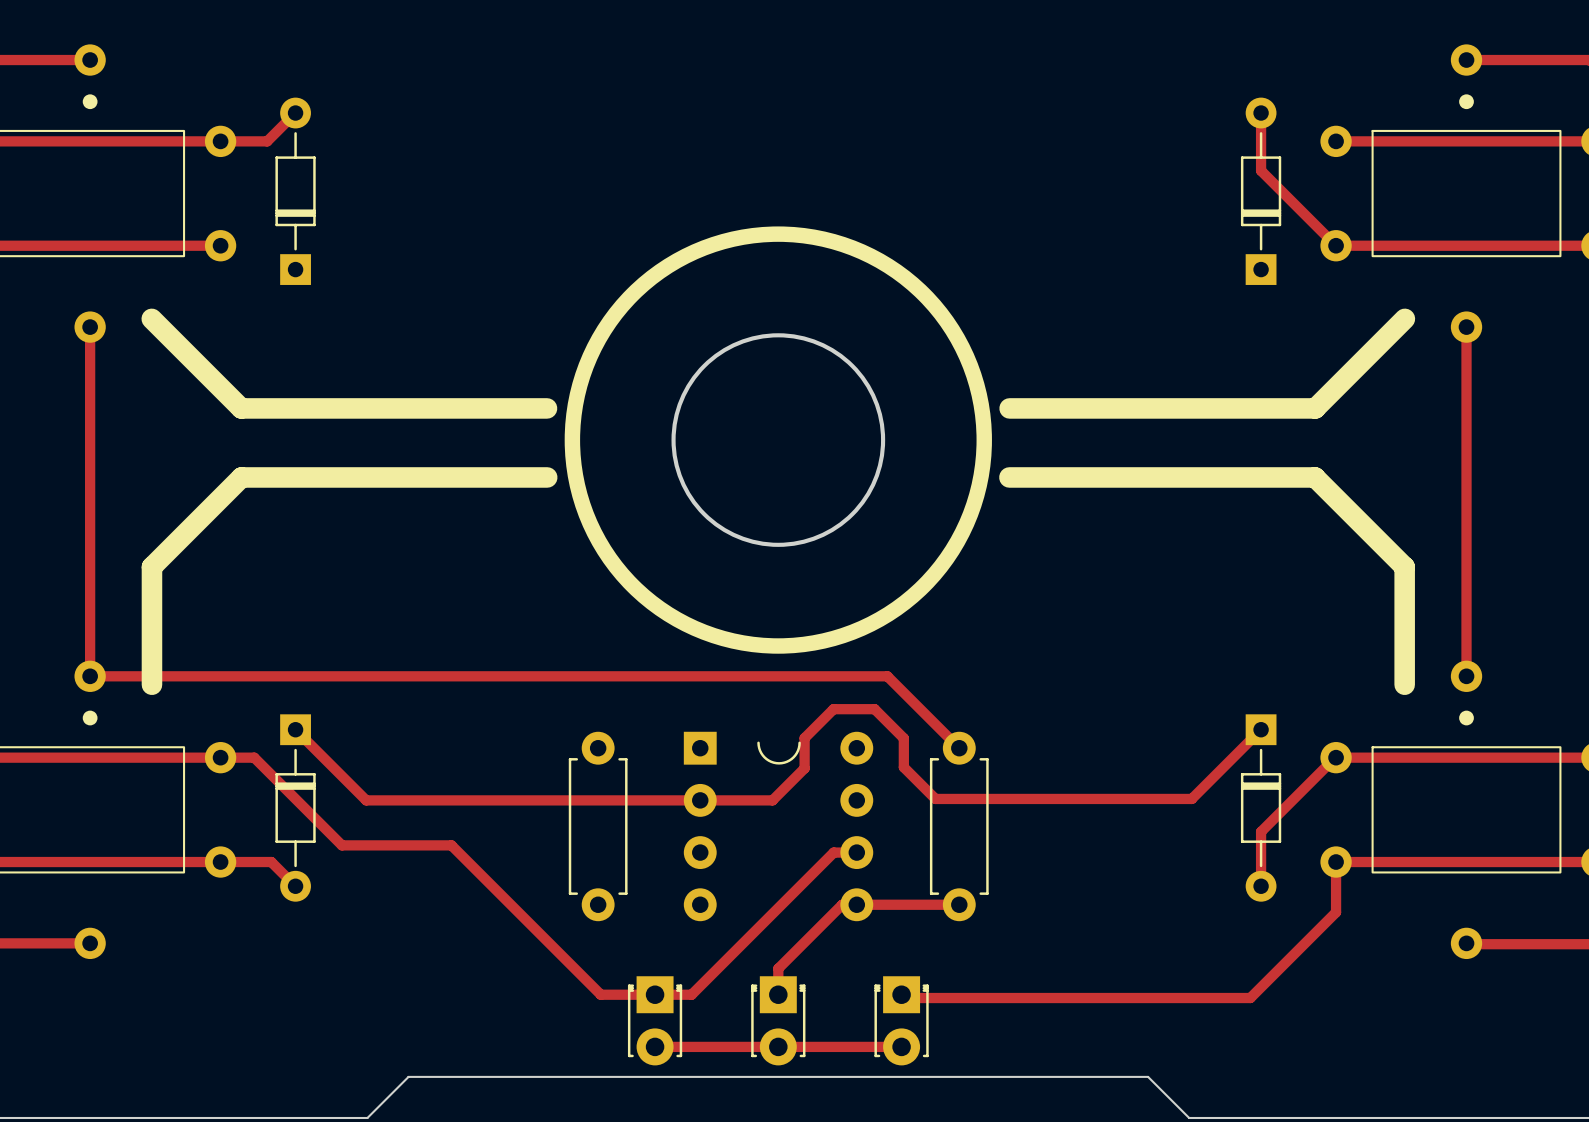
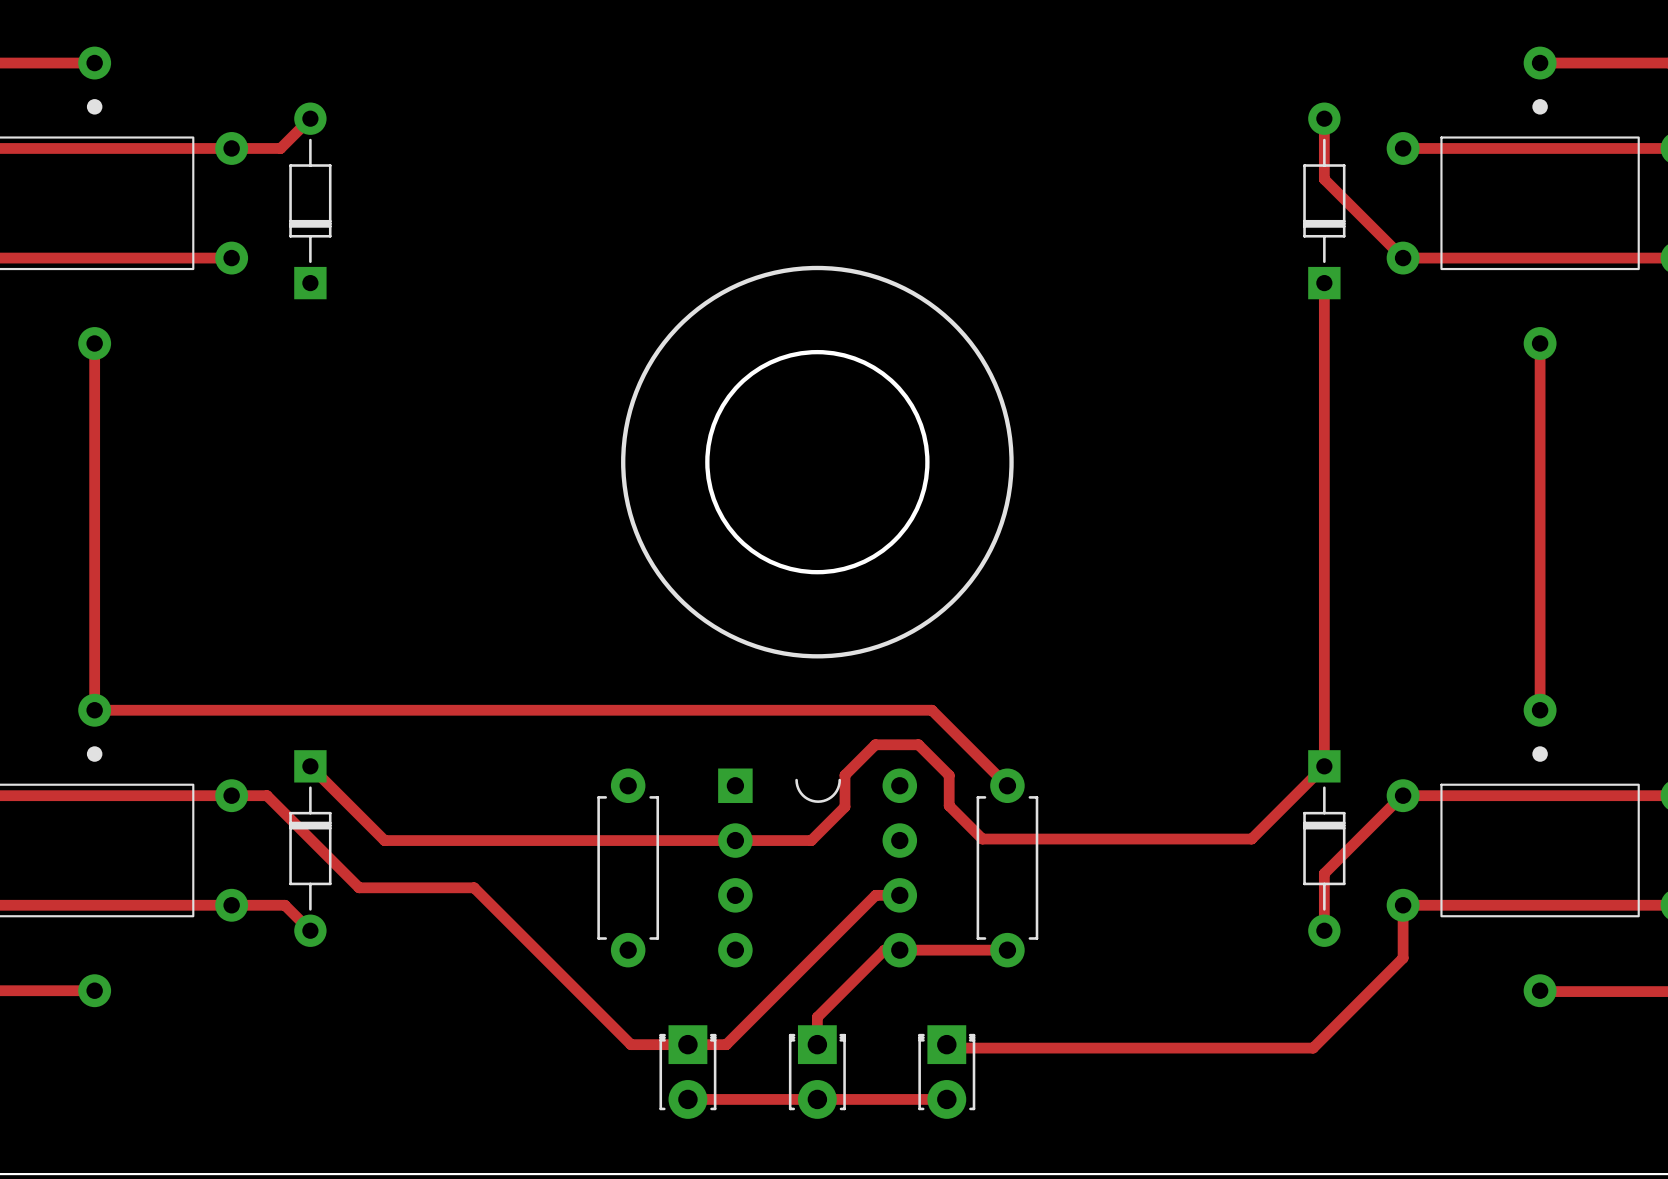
drawing shape: [564, 226, 992, 654] -> [621, 265, 1014, 659]
track: none -> (1324, 283) (1324, 766)
line: (151, 318) (241, 408) (547, 408) -> none
line: (1404, 318) (1315, 408) (1009, 408) -> none
line: (547, 477) (241, 477) (151, 567) (151, 684) -> none
line: (1009, 477) (1315, 477) (1404, 567) (1404, 684) -> none
board edge: (367, 1117) (408, 1076) (1148, 1076) (1189, 1117) -> (385, 1174) (1248, 1174)

